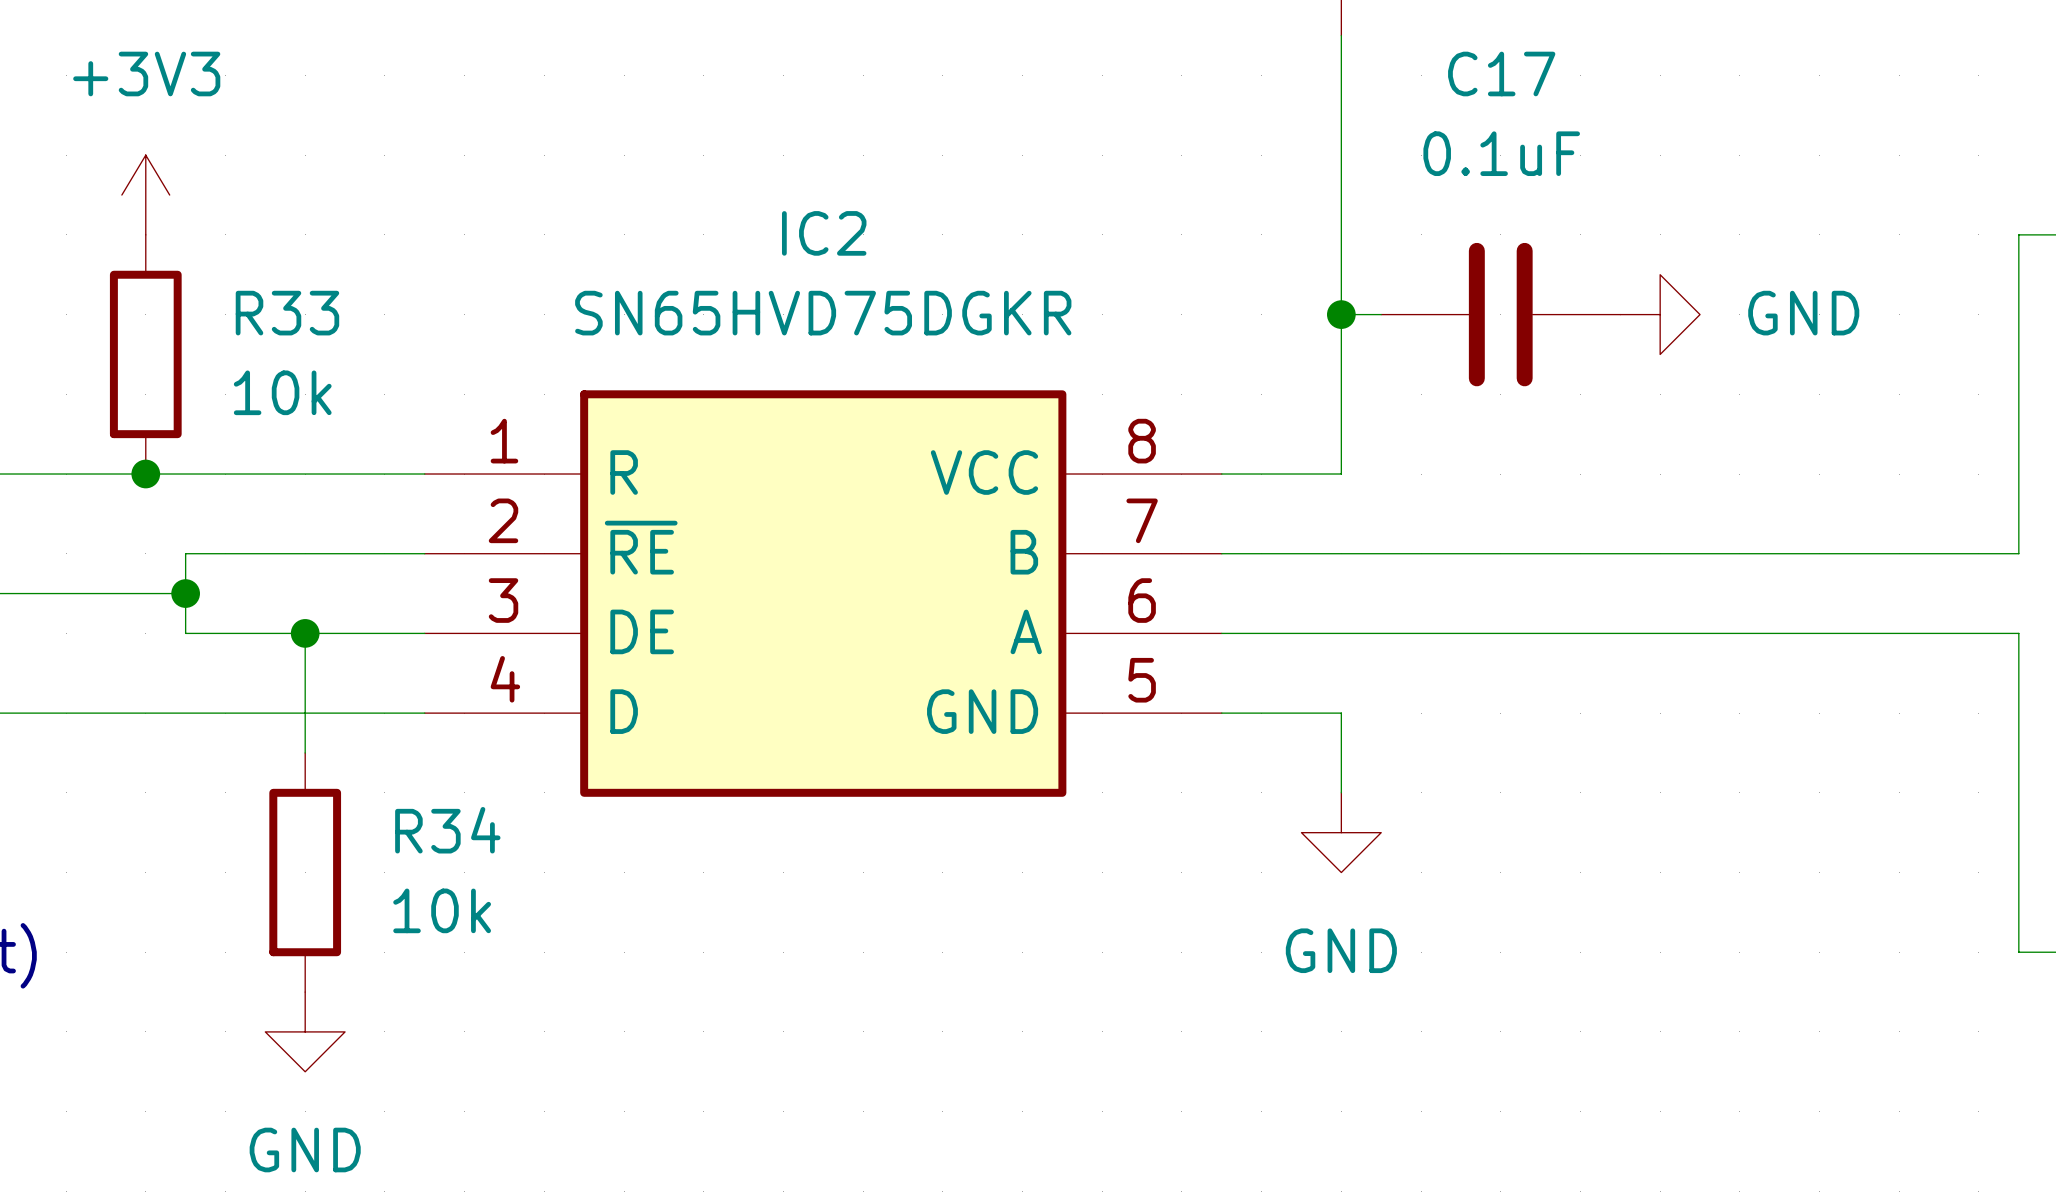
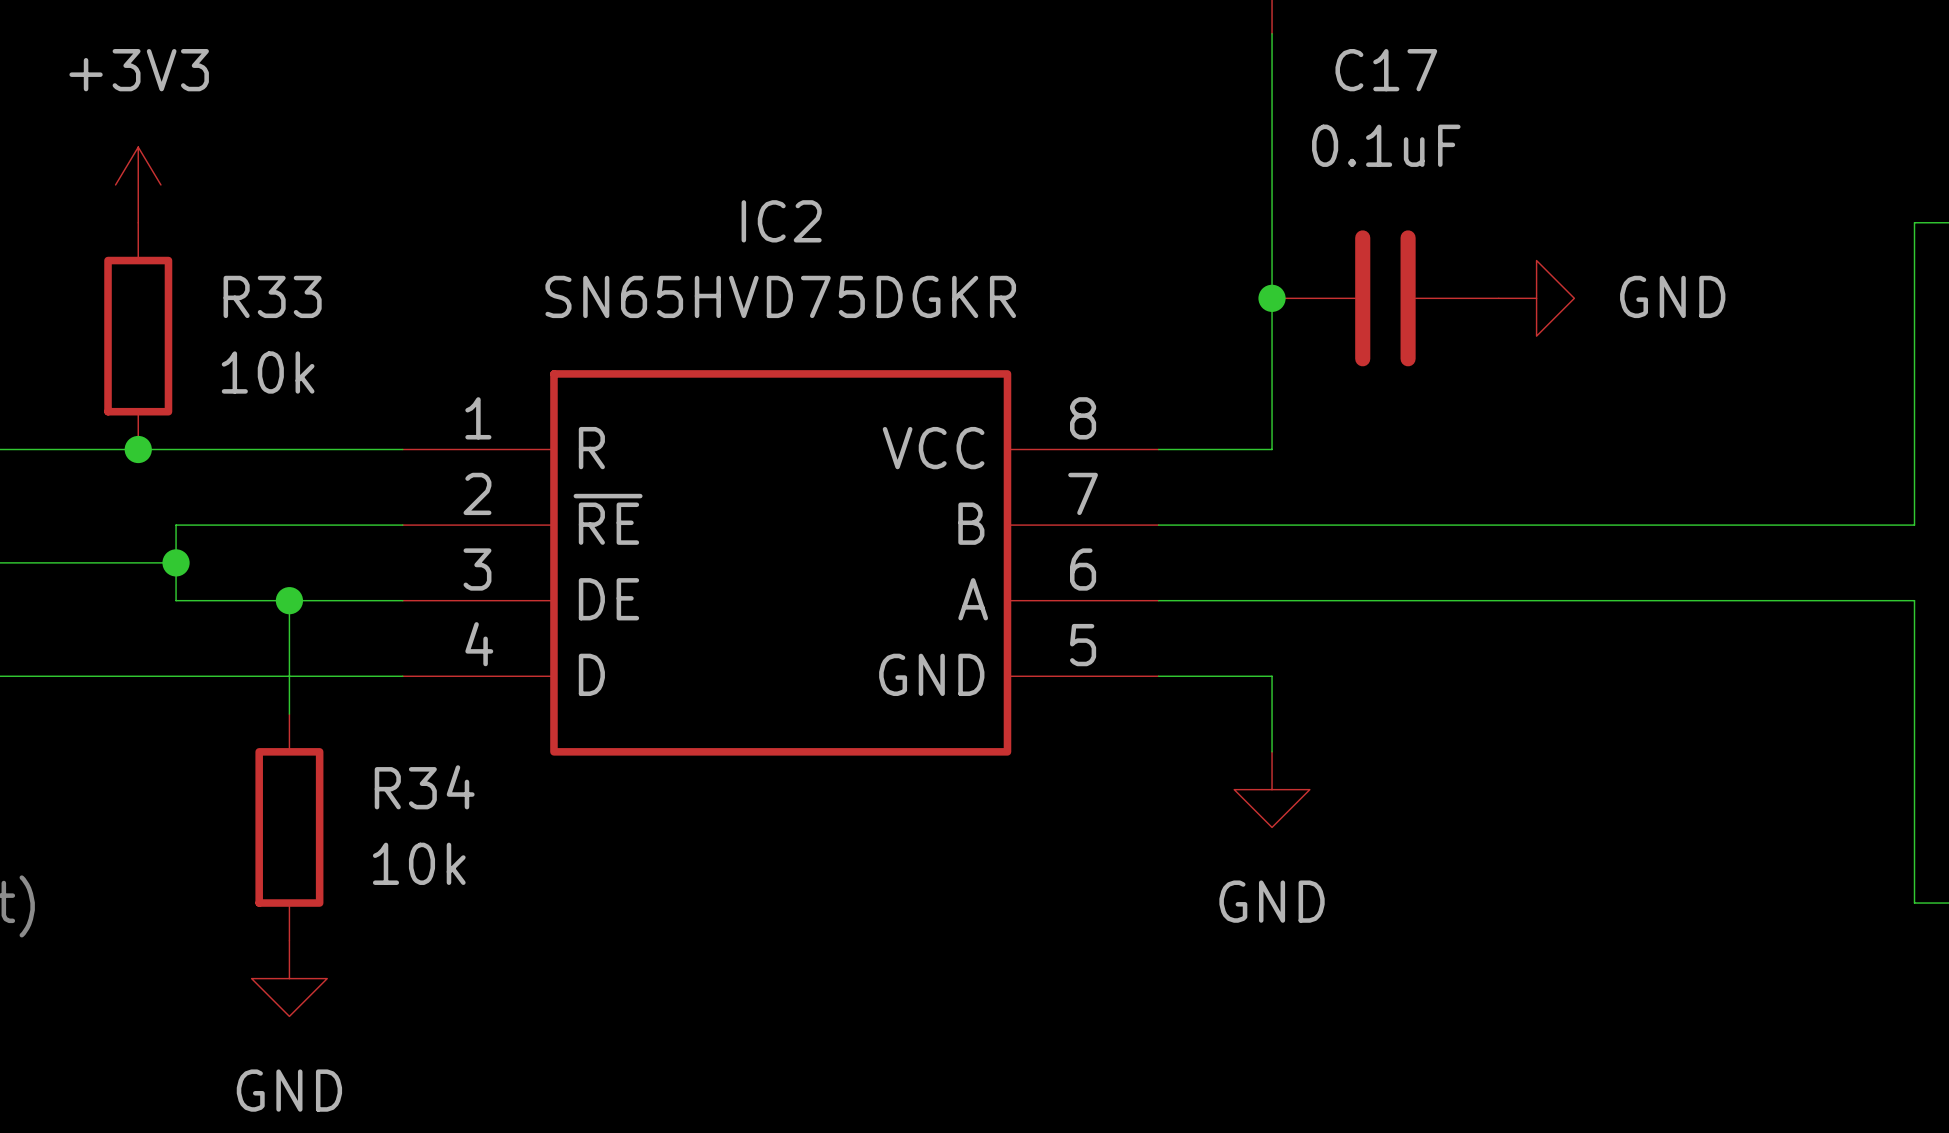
C17 position: (1500, 314) -> (1385, 298)
power symbol position: GND (1660, 314) -> GND (1536, 298)

